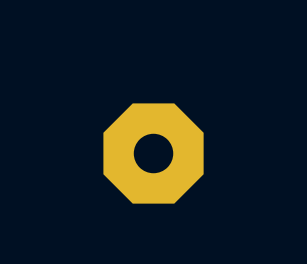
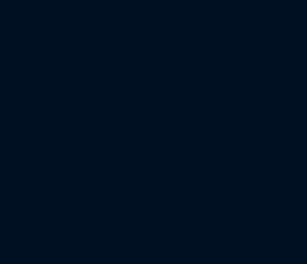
part: (153, 153) -> none

